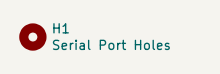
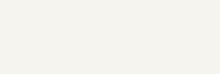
H1: Serial Port Holes (32, 37) -> none

